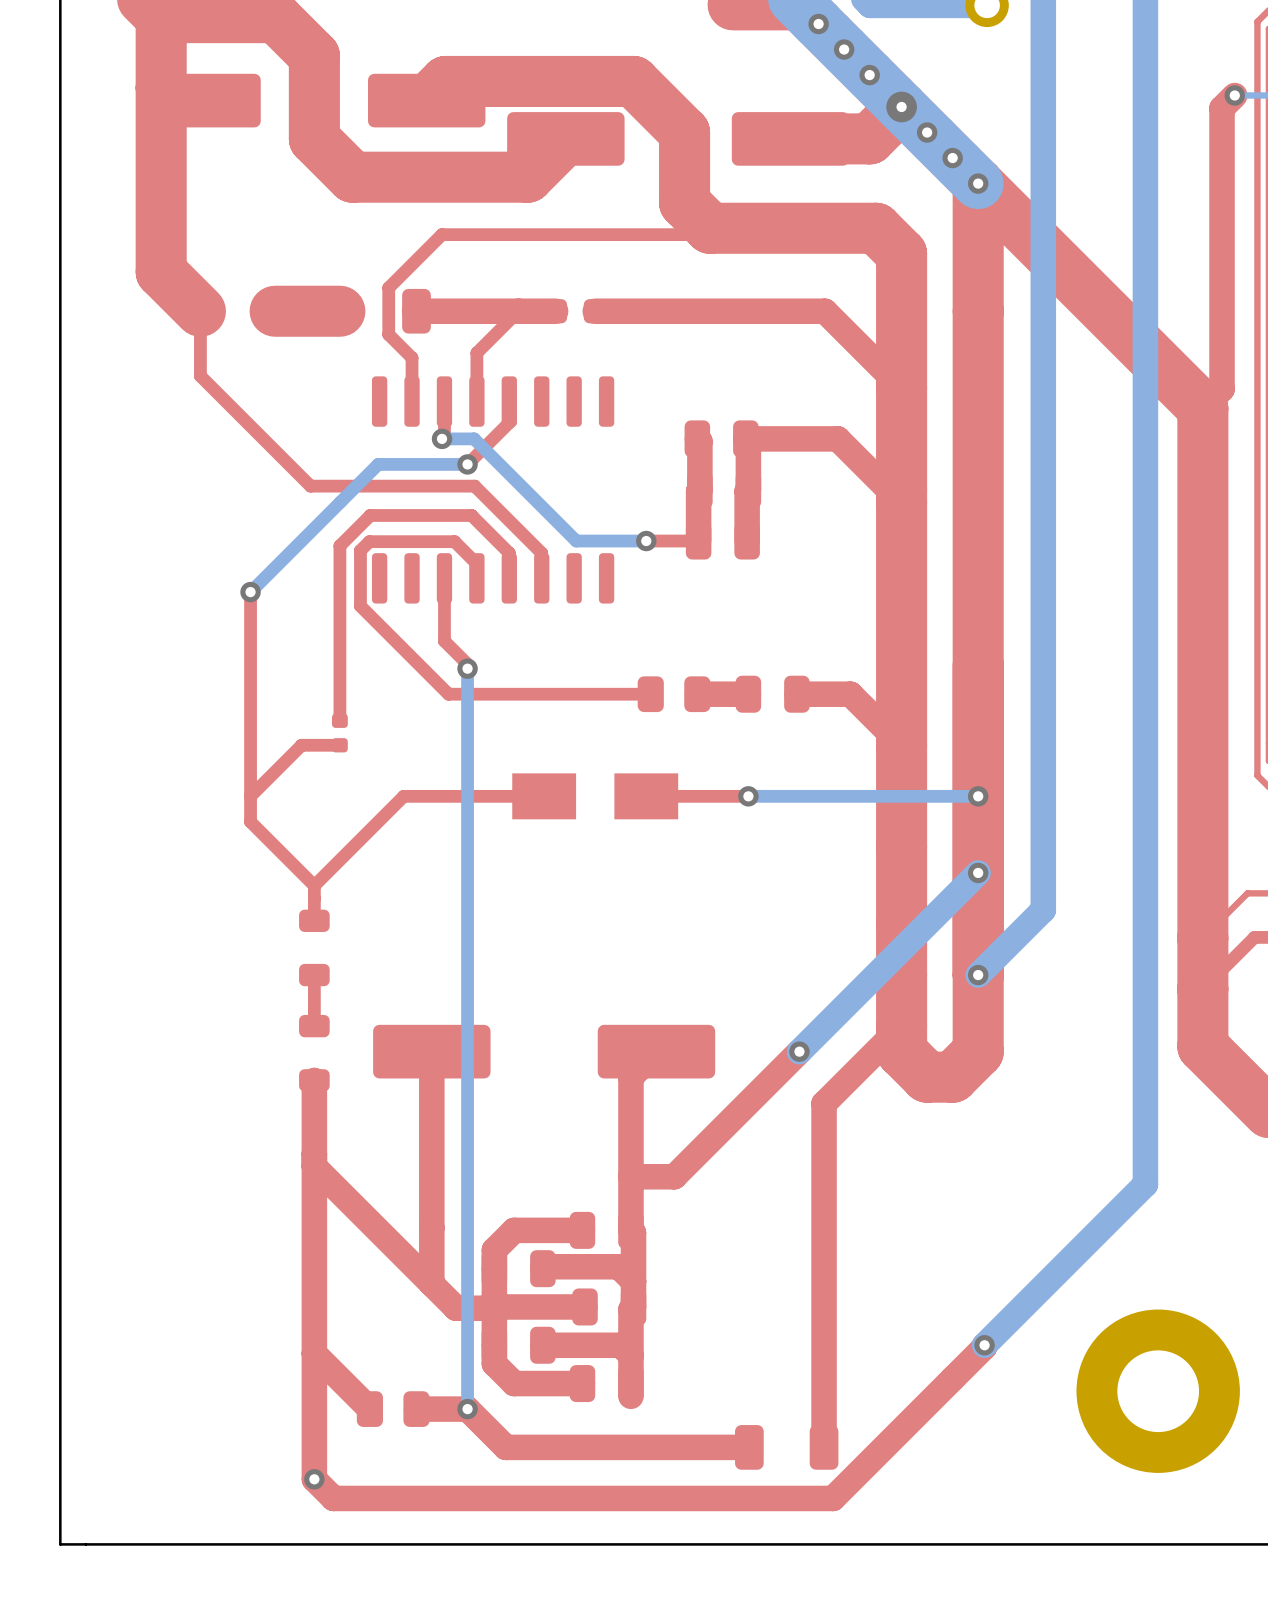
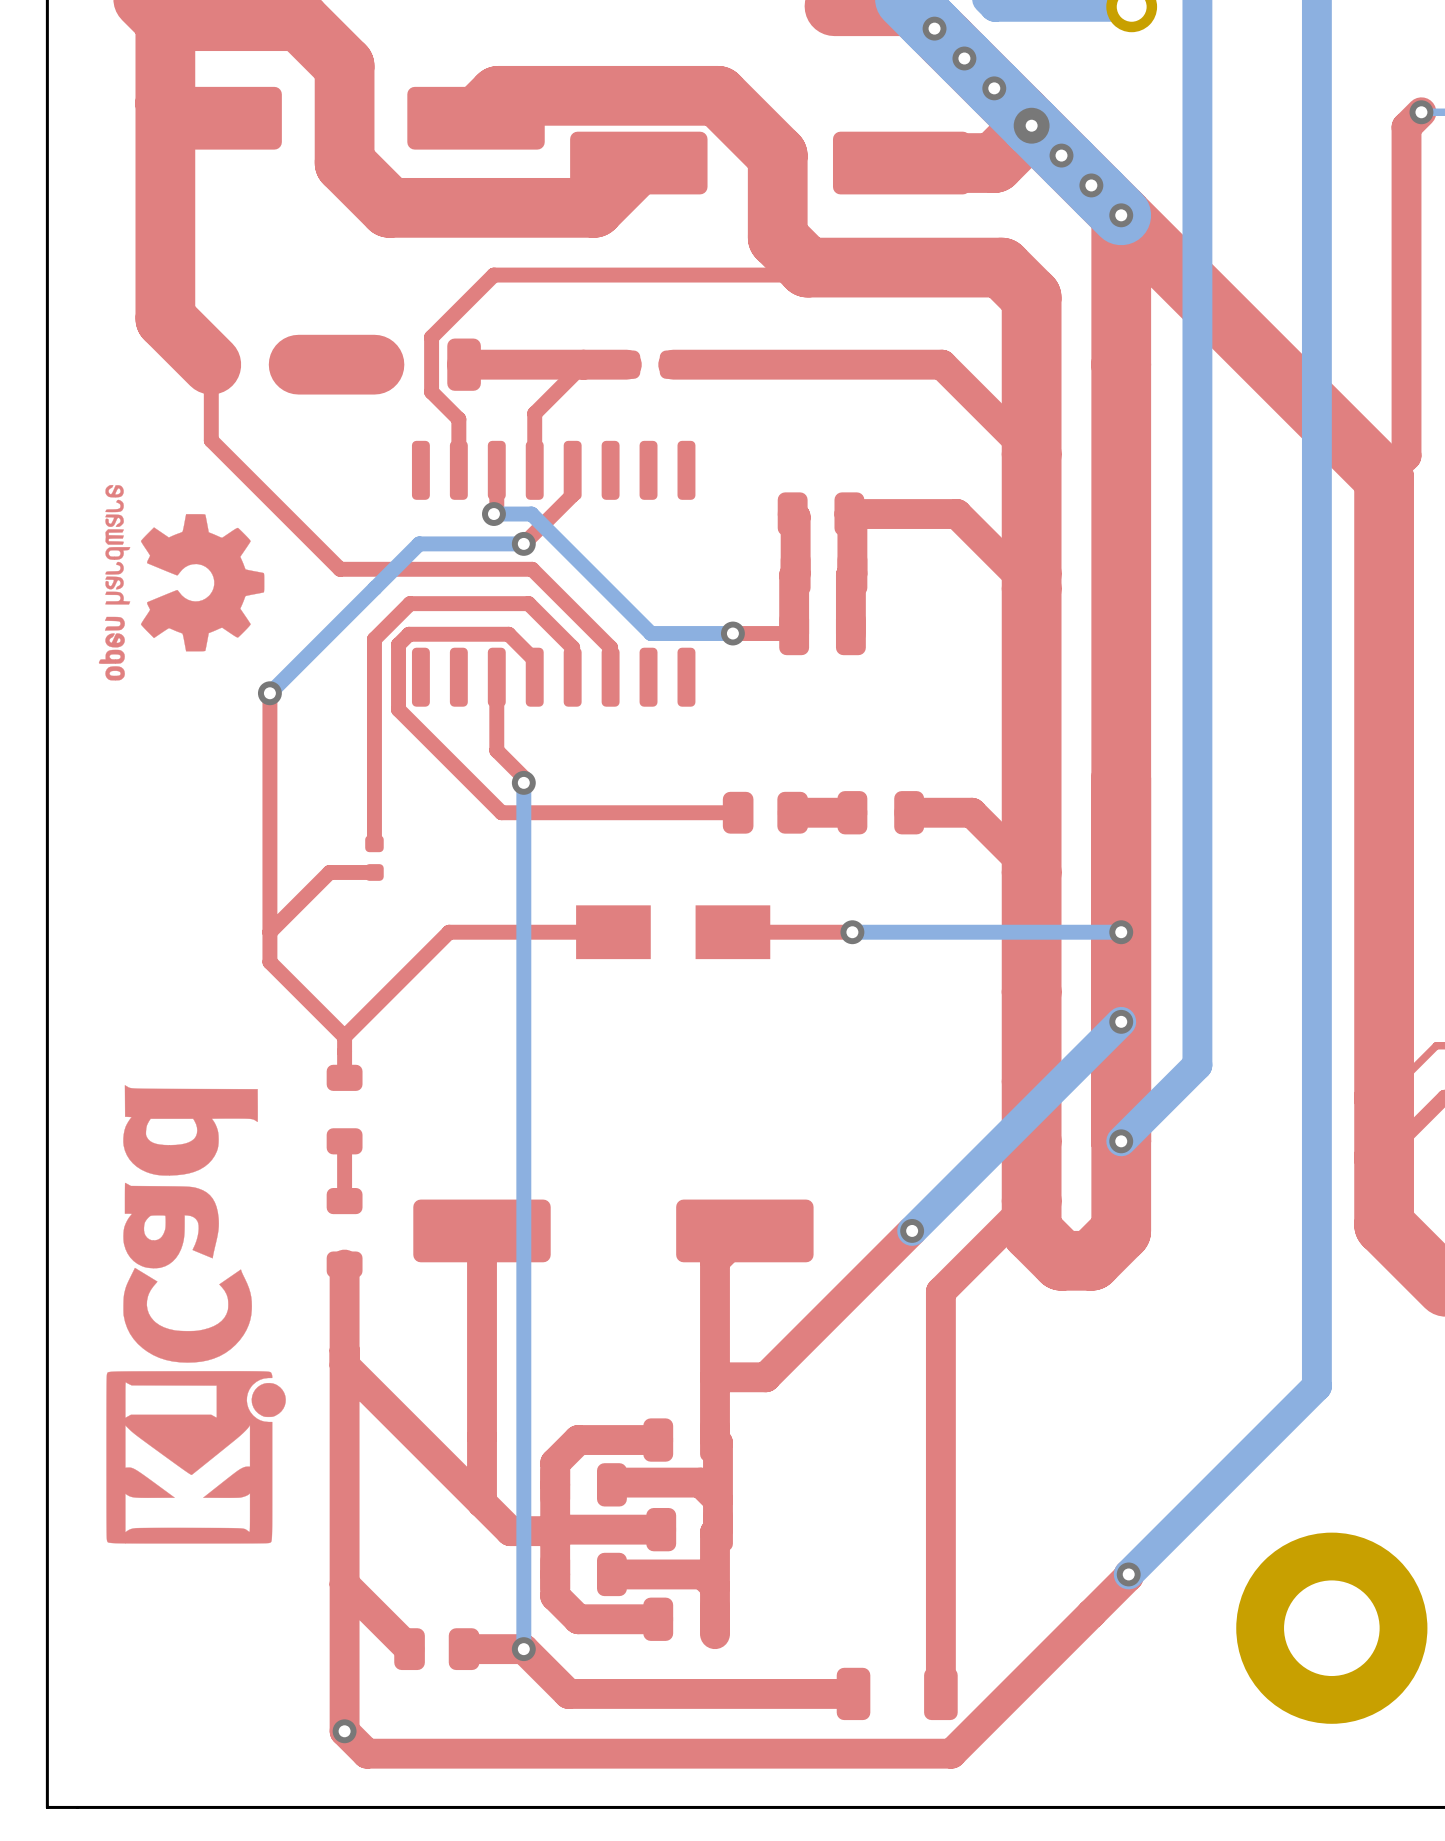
drawing: none -> [98, 485, 265, 681]
drawing: none -> [106, 1085, 286, 1544]

